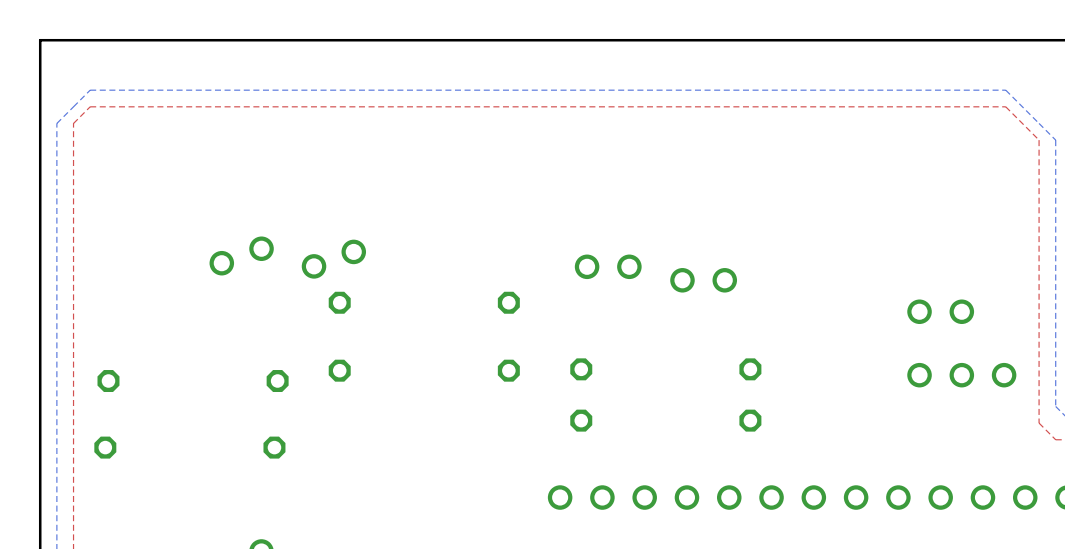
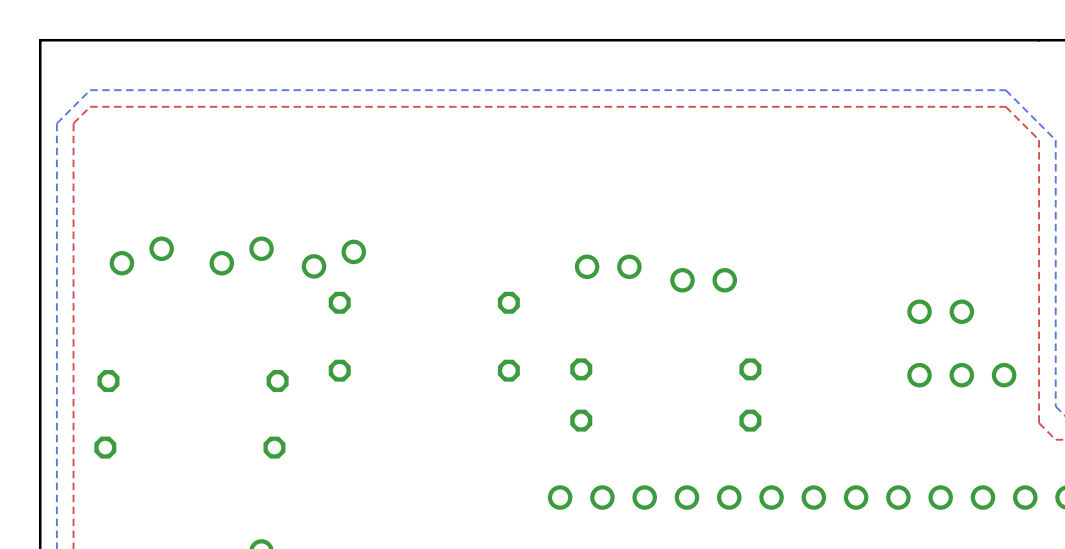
part: none -> (141, 255)

